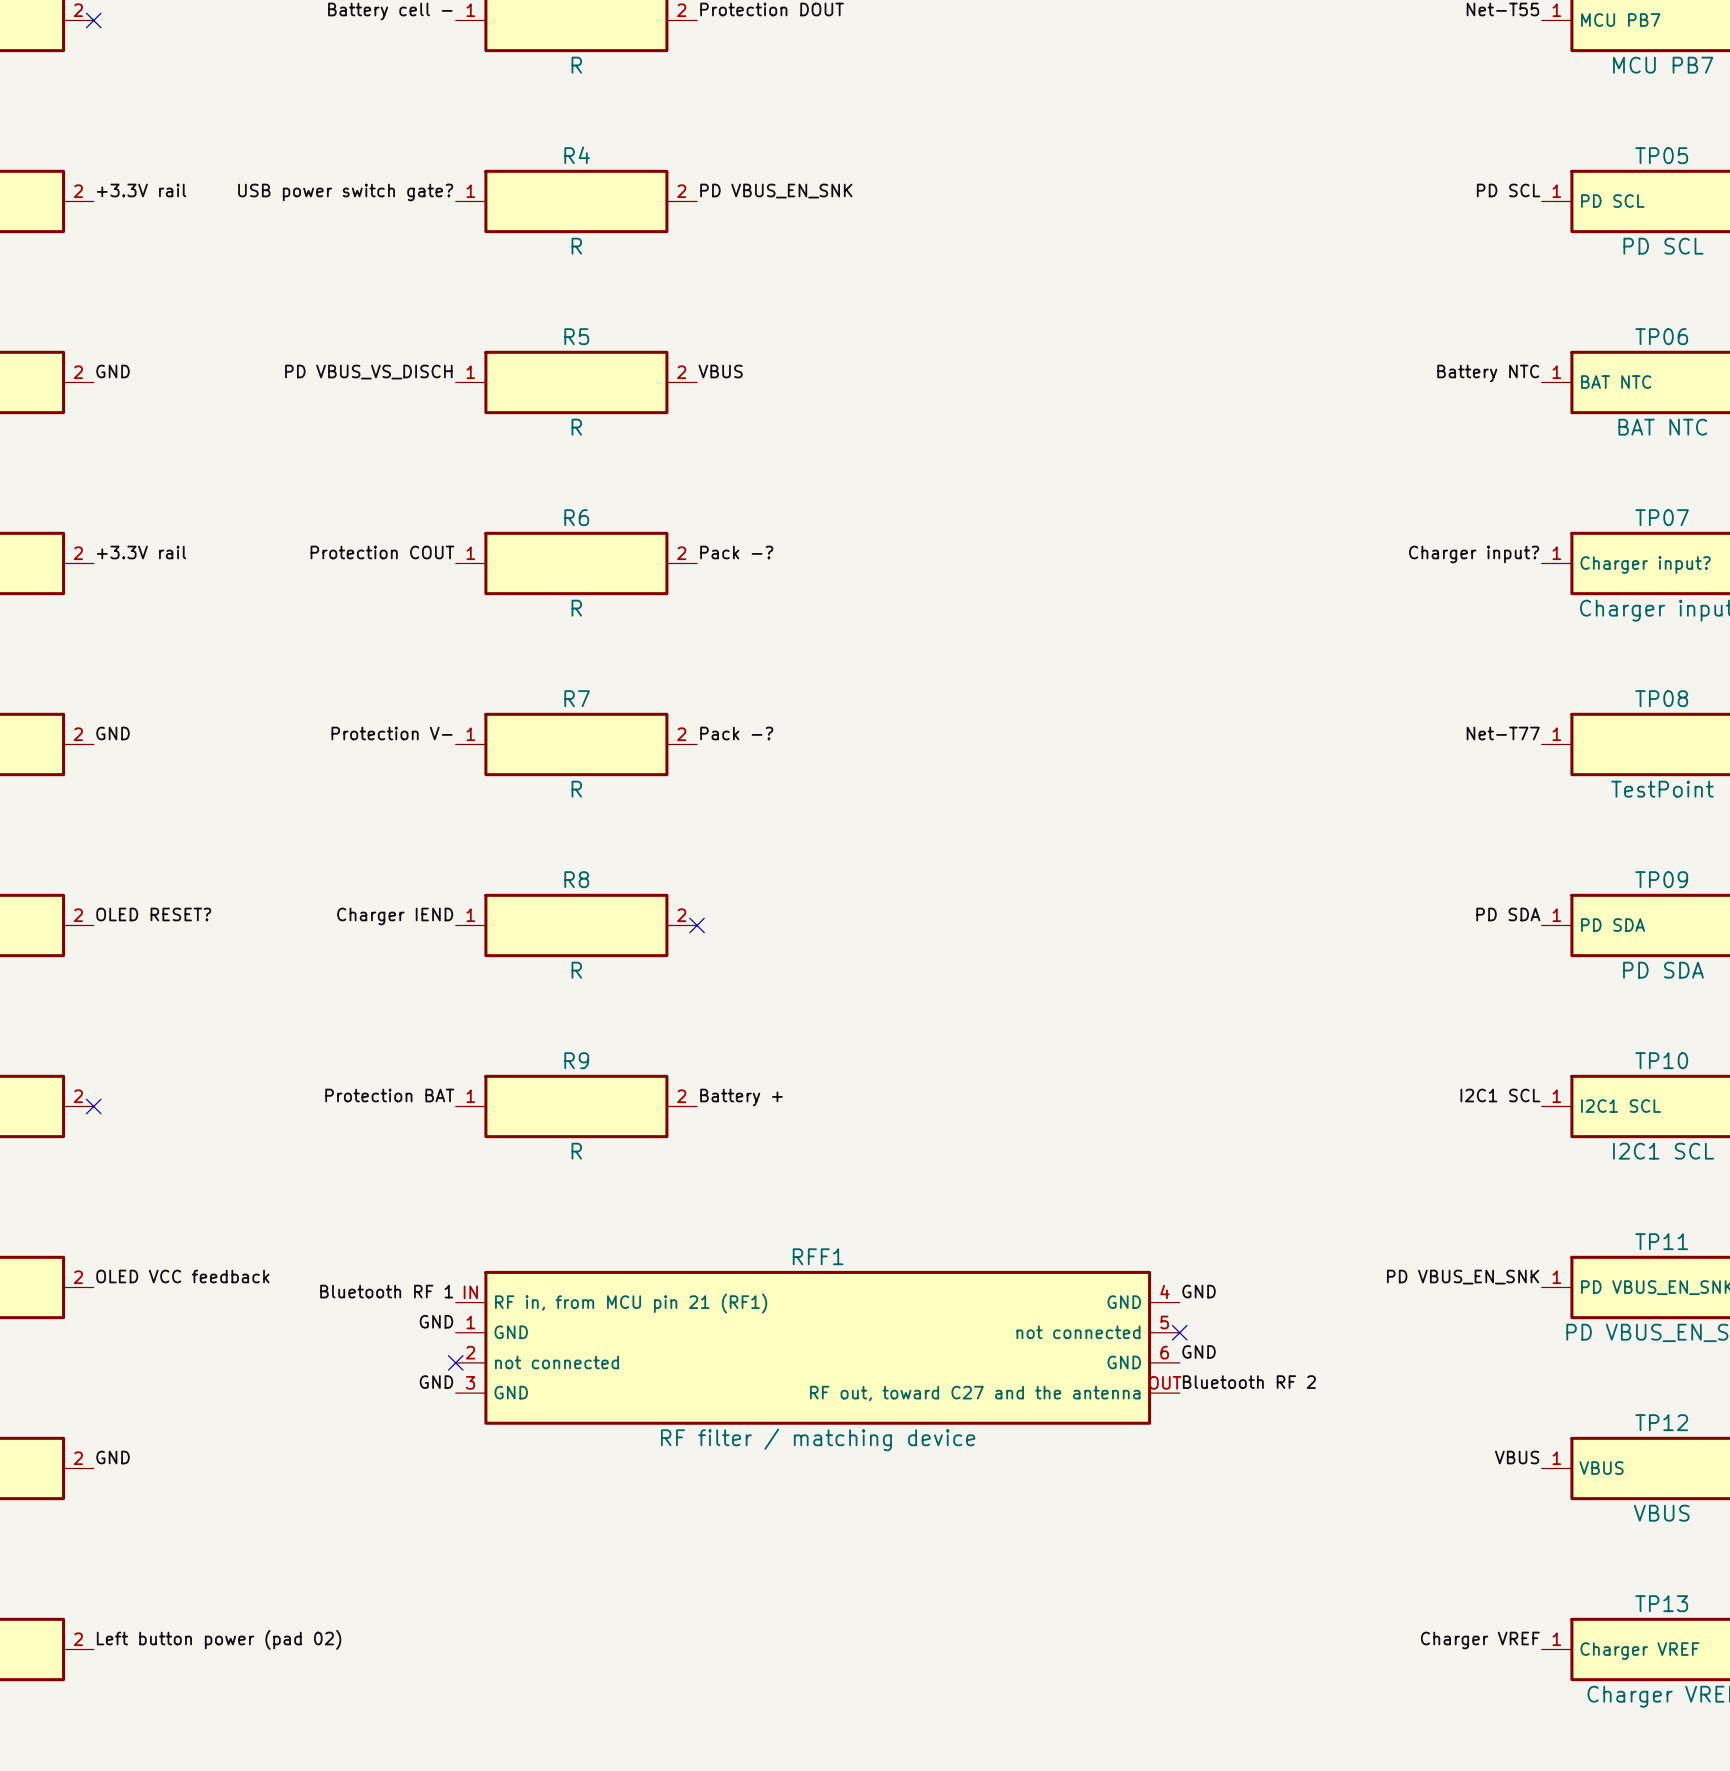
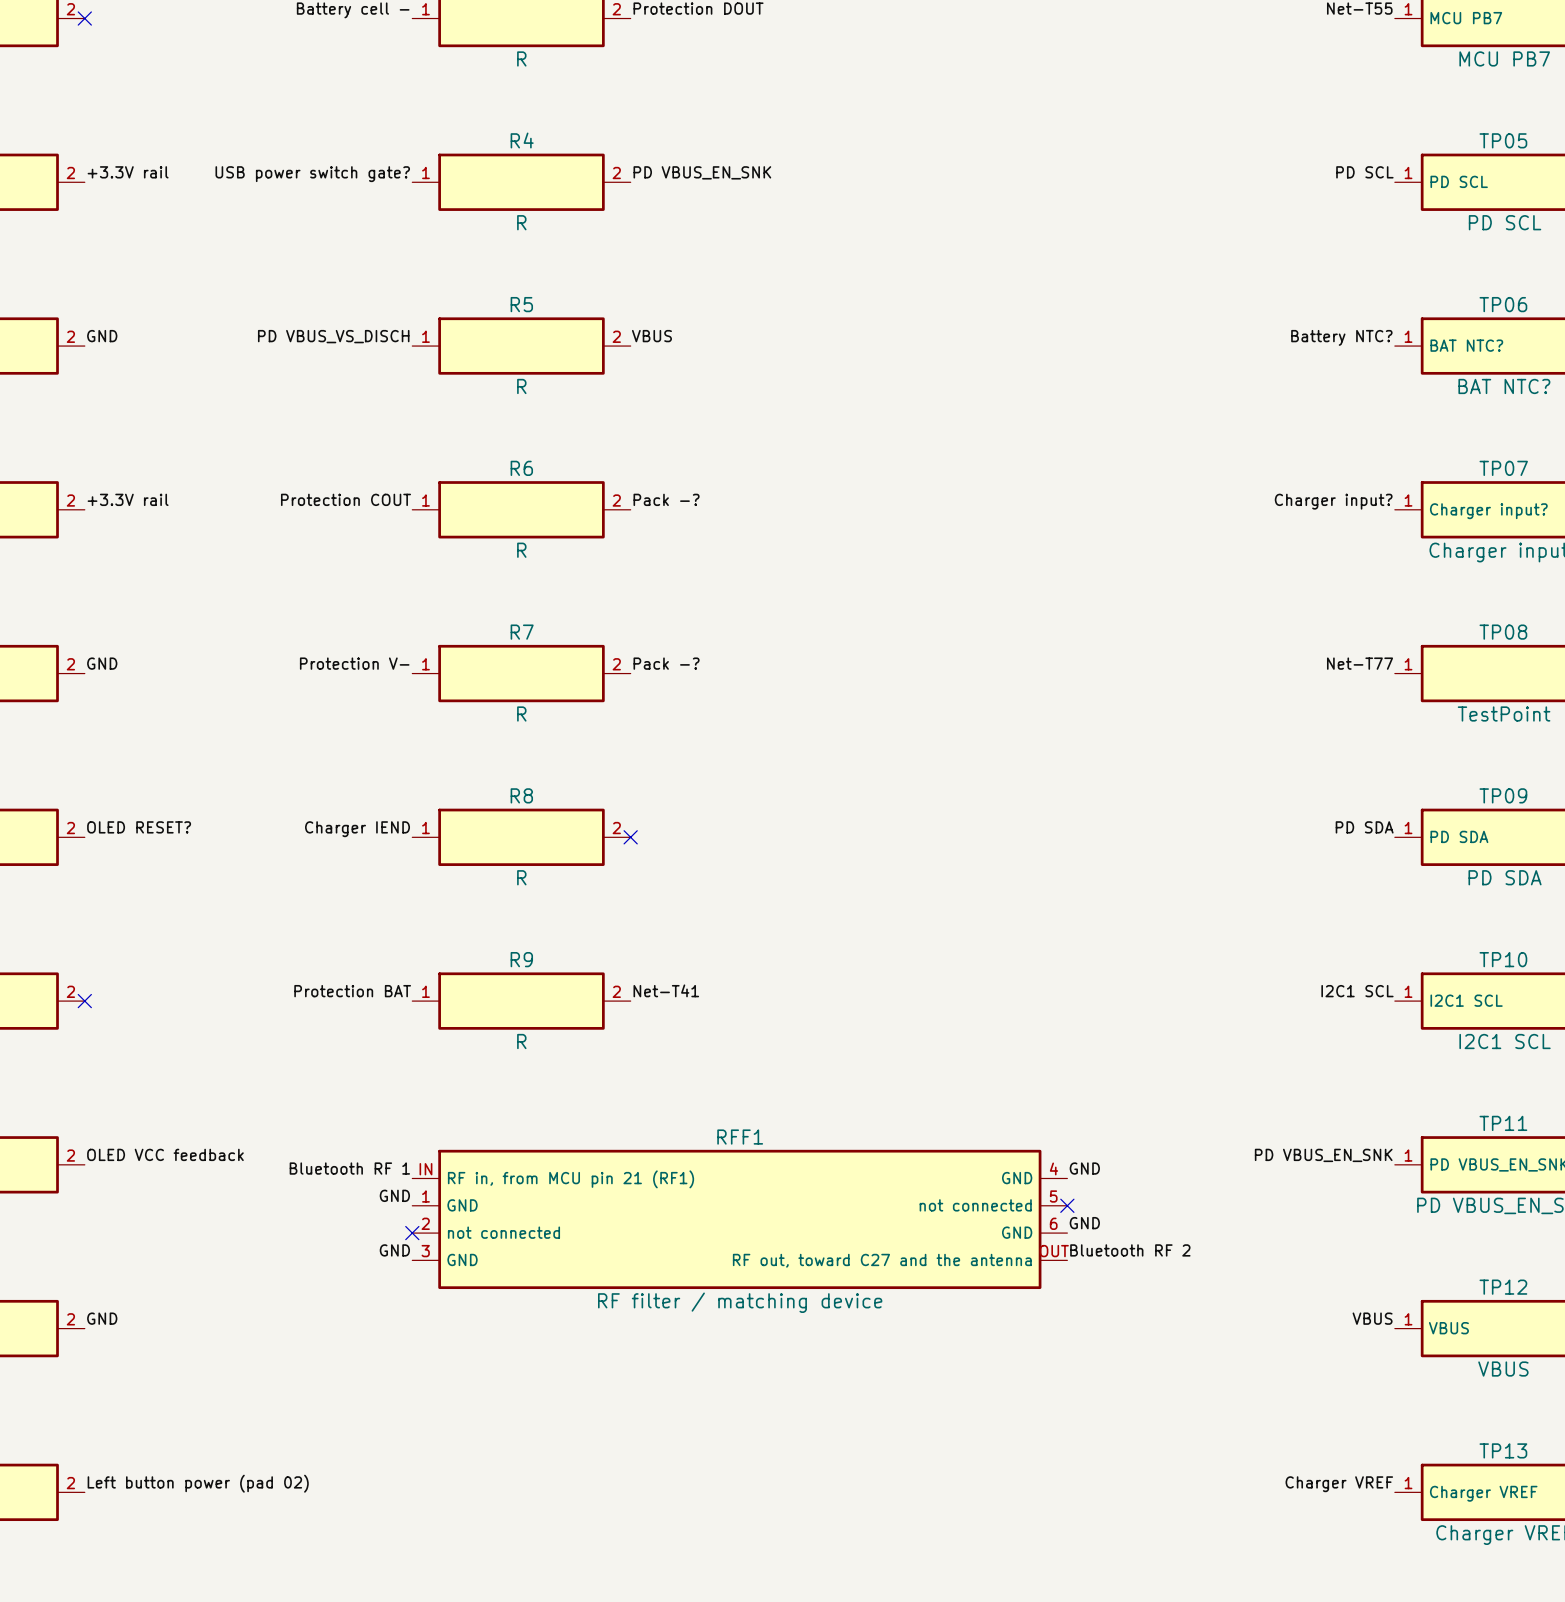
label: Battery NTC (1488, 373) -> Battery NTC? (1341, 337)
TP06 pin name: BAT NTC (1616, 382) -> BAT NTC? (1466, 345)
TP06 value: BAT NTC (1662, 427) -> BAT NTC? (1504, 386)
label: Battery + (741, 1097) -> Net-T41 (666, 990)

